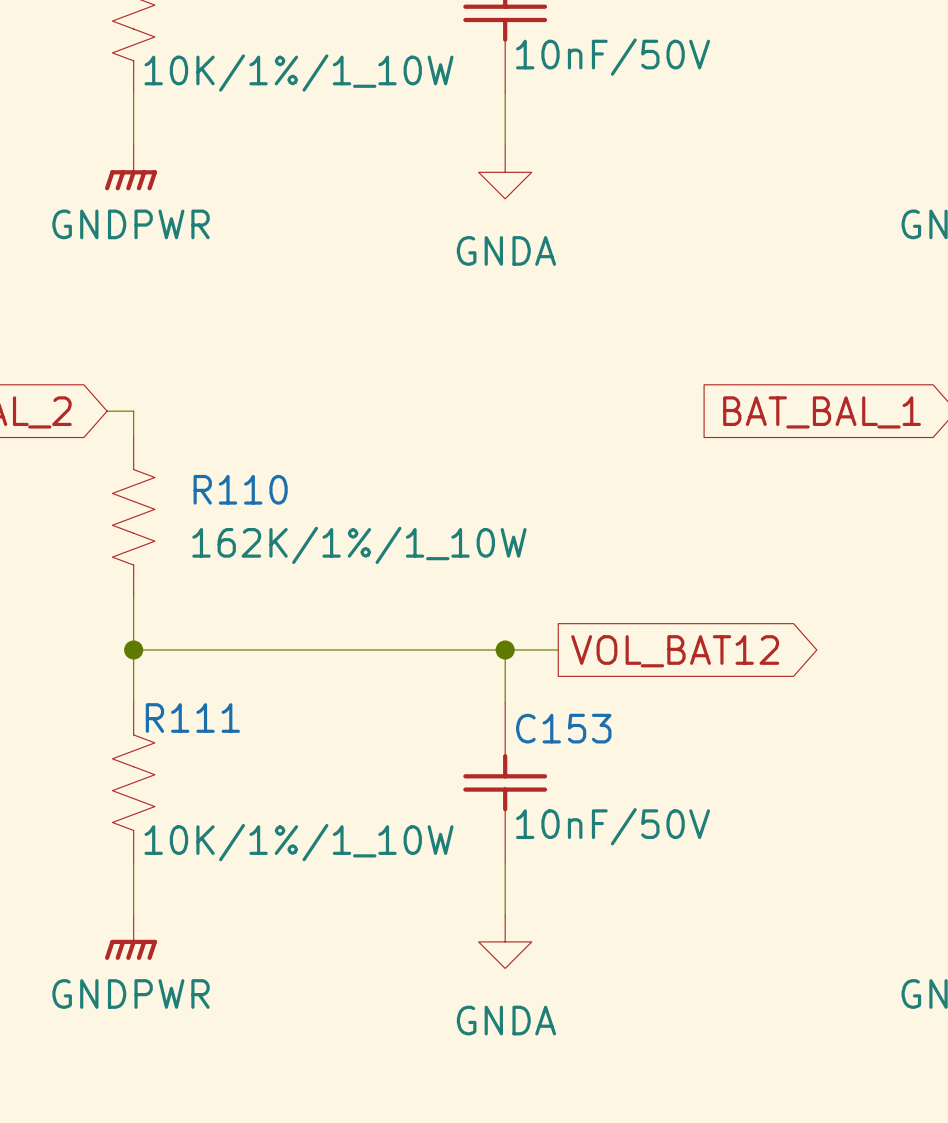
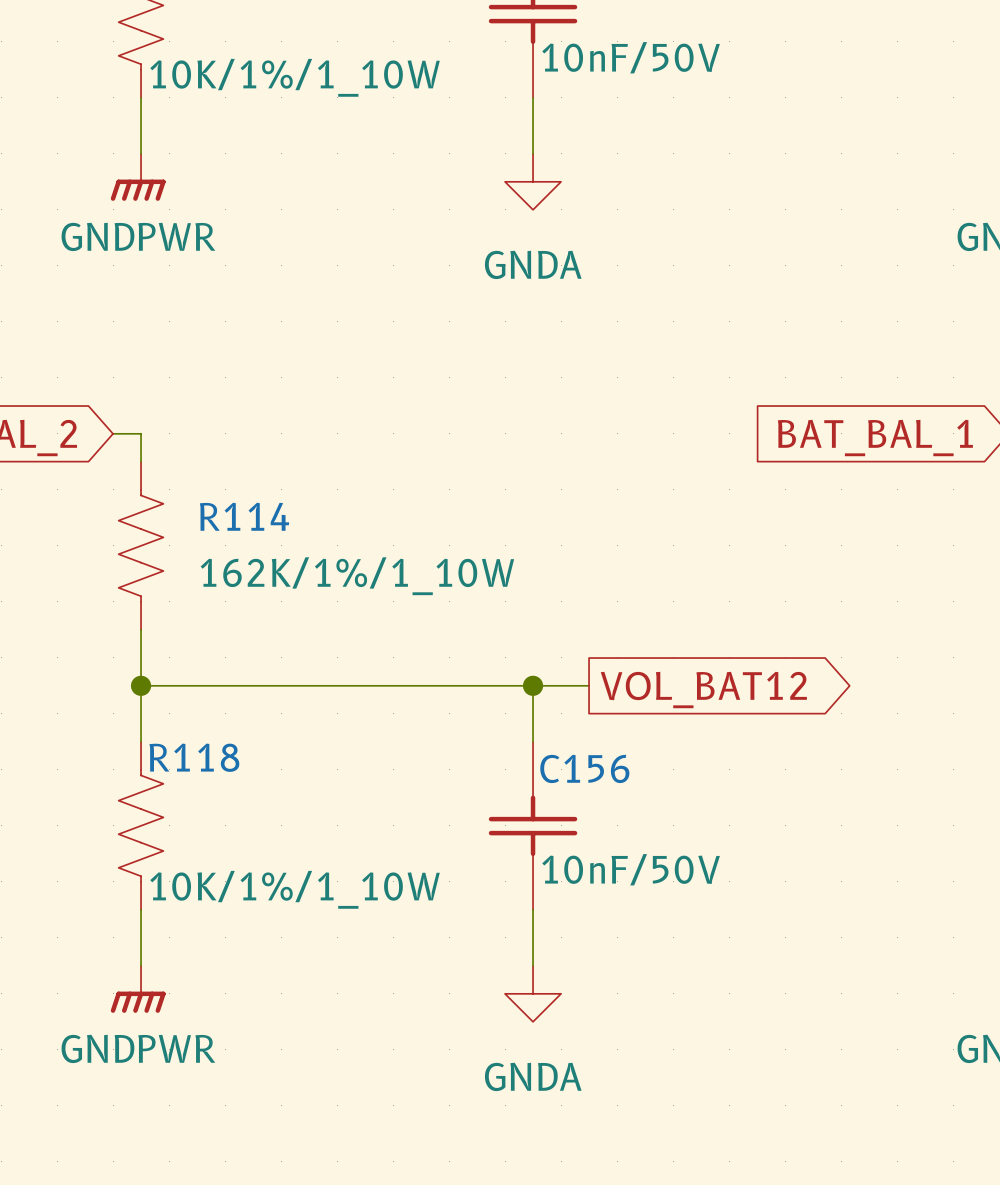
R110 name: R110 (240, 489) -> R114 (244, 516)
R111 name: R111 (192, 718) -> R118 (194, 757)
C153 name: C153 (563, 728) -> C156 (584, 768)

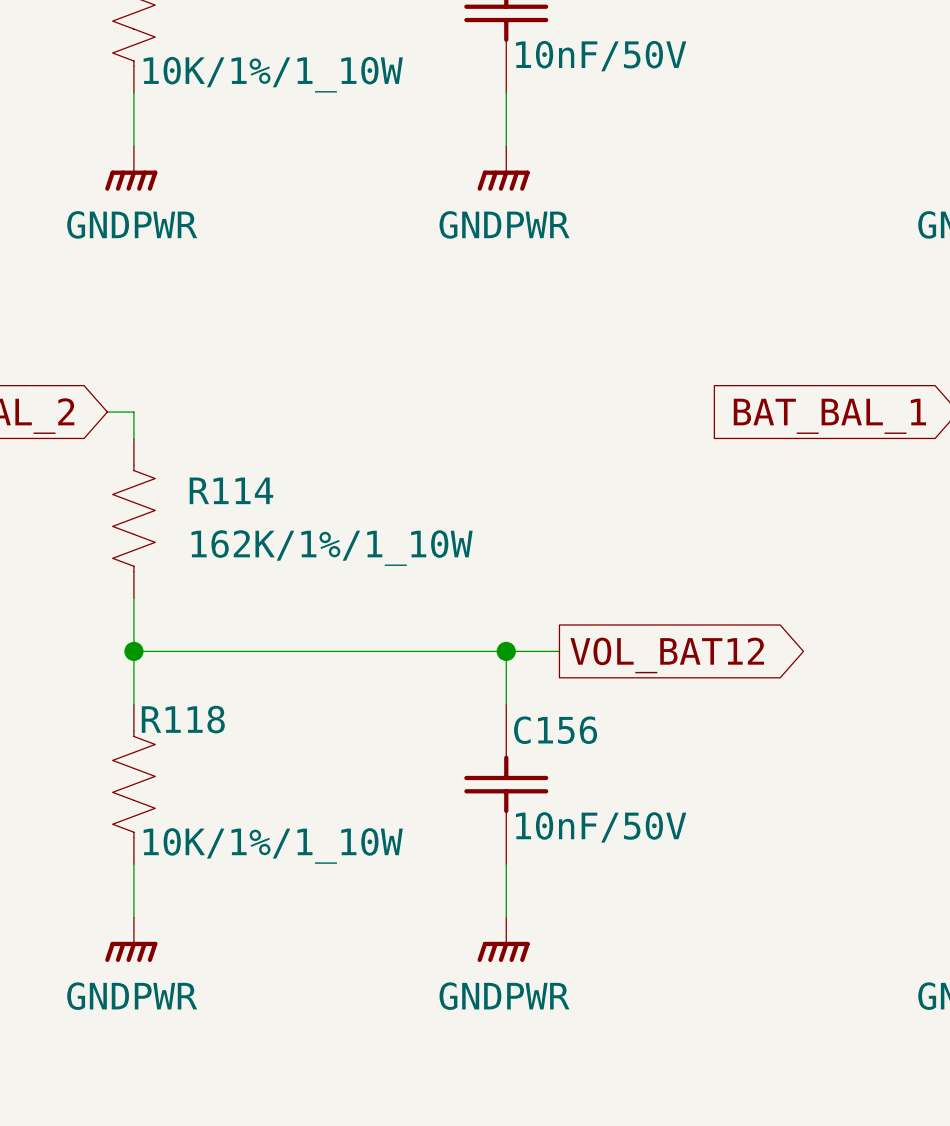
power symbol: GNDA (533, 181) -> GNDPWR (503, 168)
power symbol: GNDA (533, 993) -> GNDPWR (503, 939)

